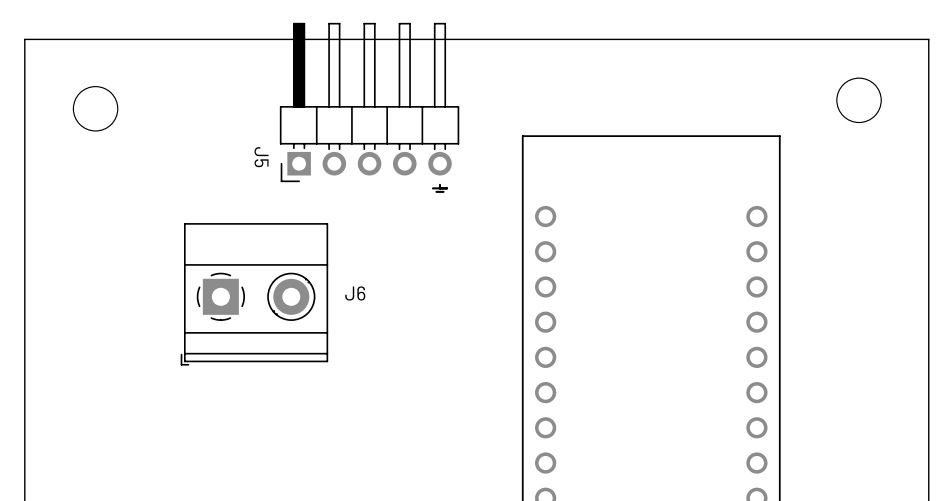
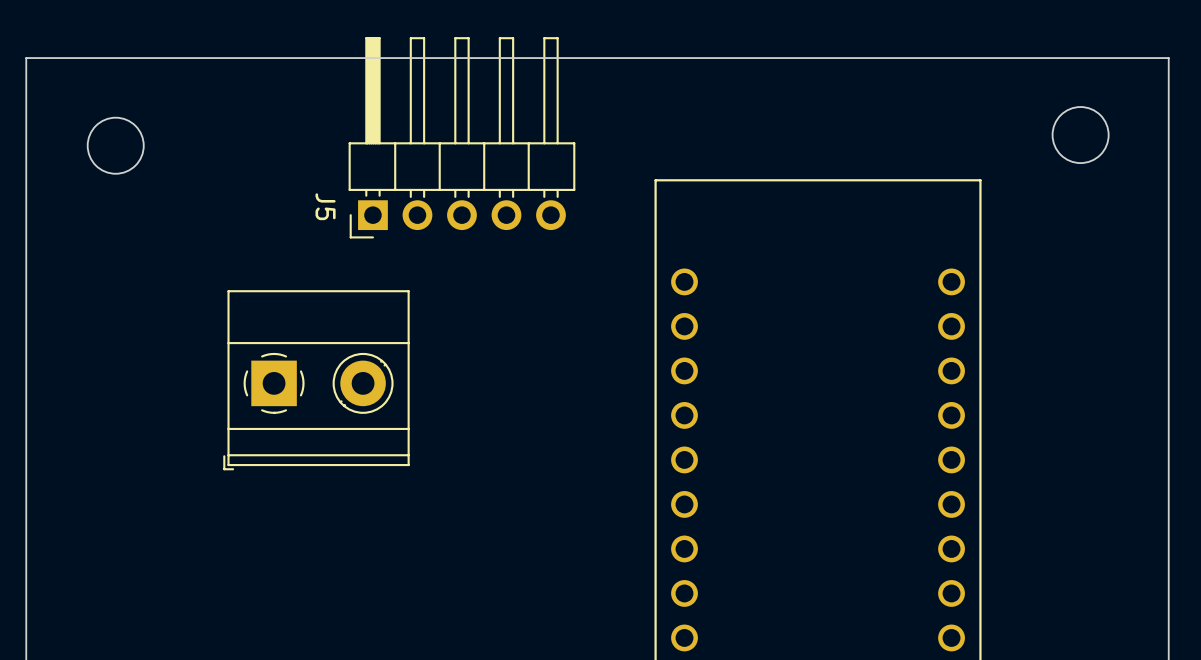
line: (439, 184) (439, 188) -> none
line: (447, 188) (432, 188) -> none
line: (443, 191) (436, 191) -> none
J6 name: J6 (355, 293) -> none

